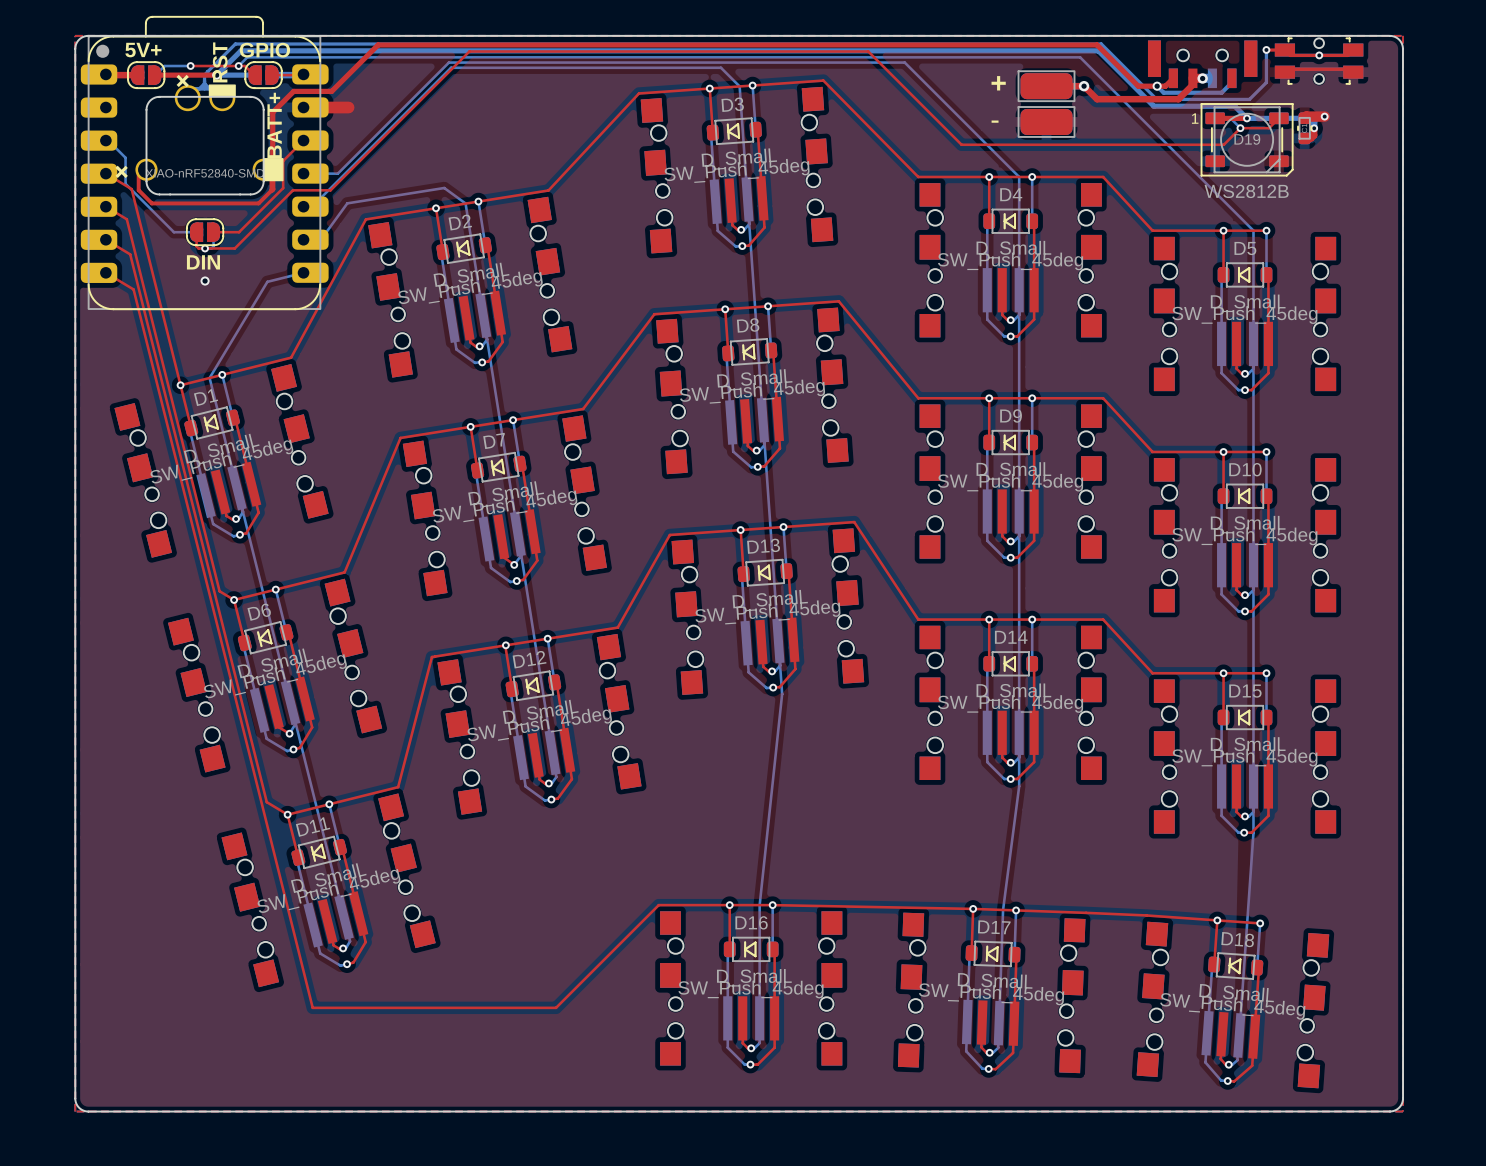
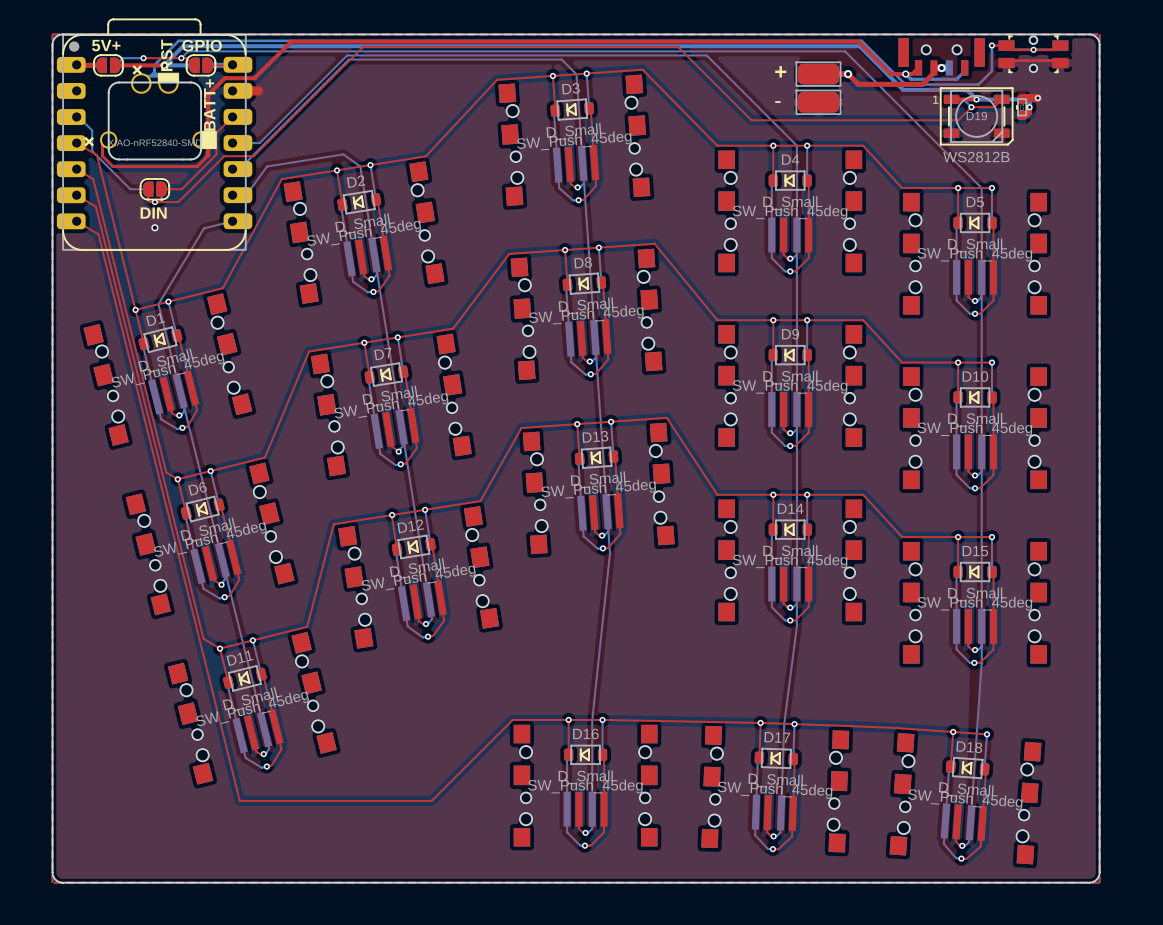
top track: (336, 107) (348, 107) -> none

